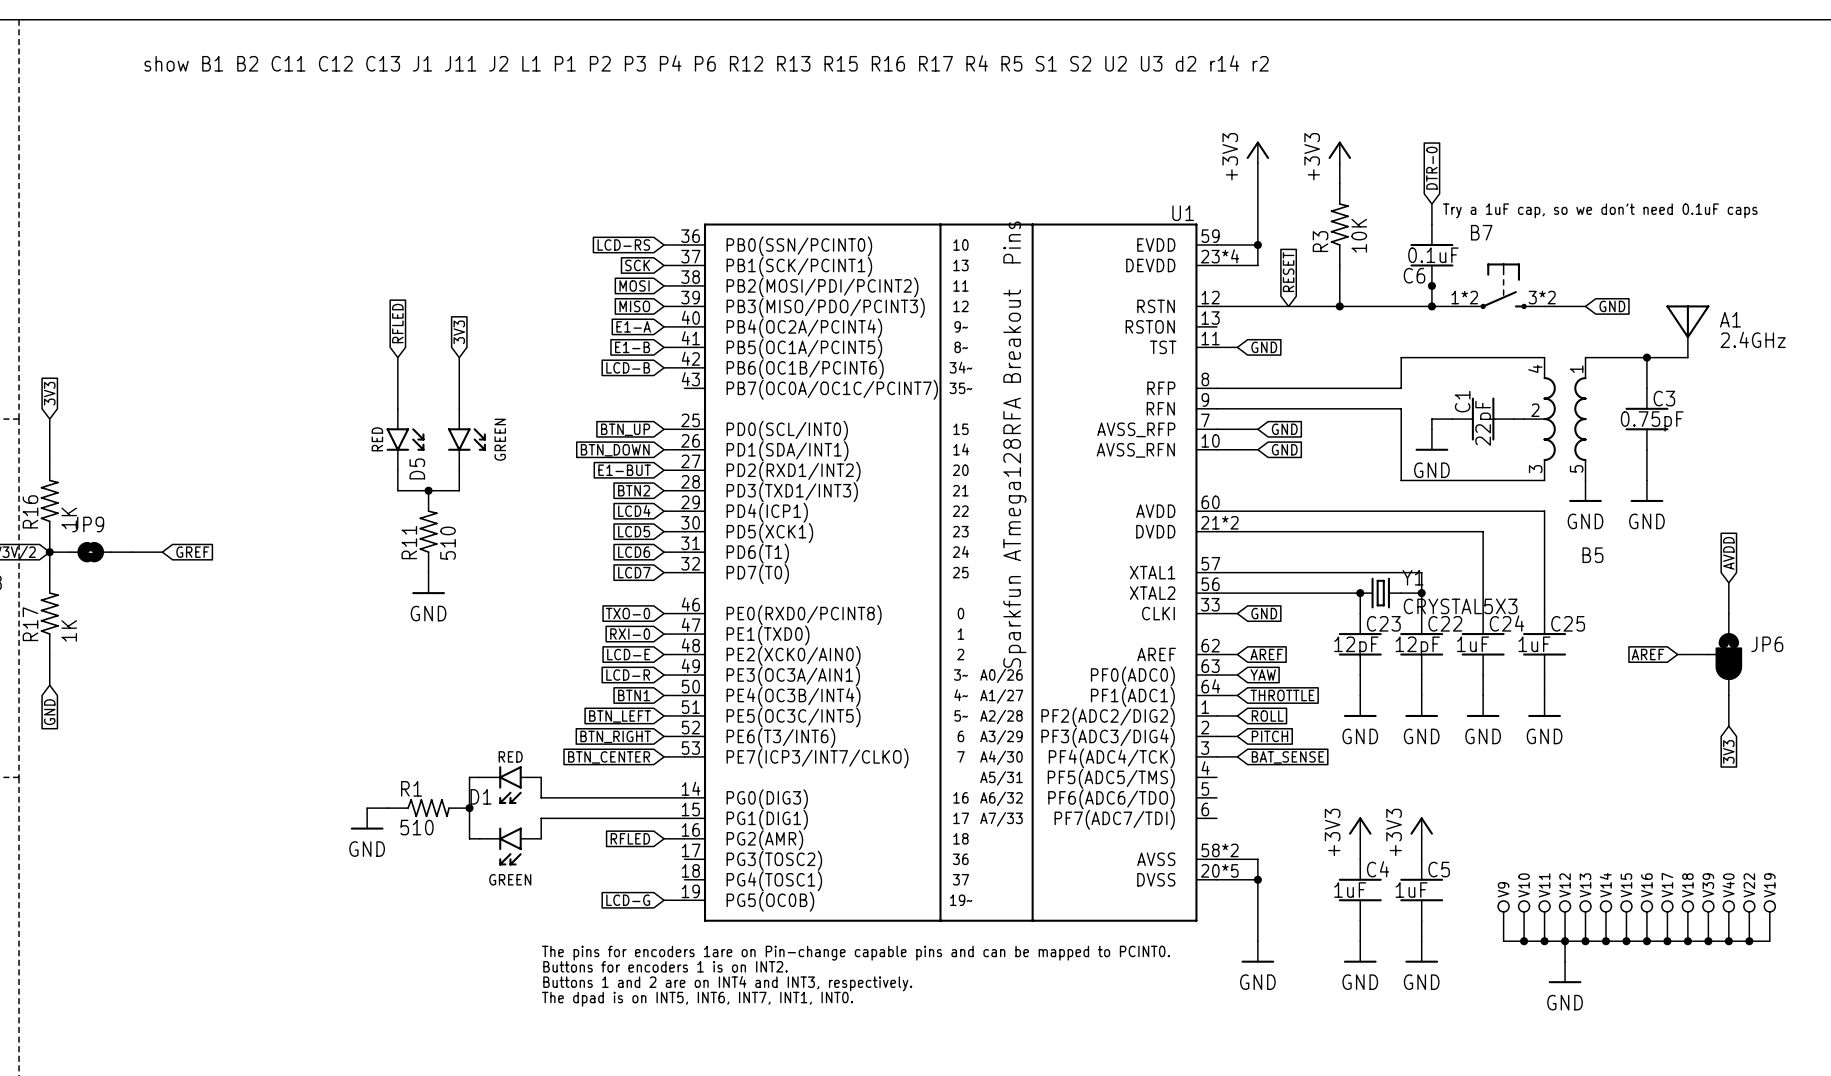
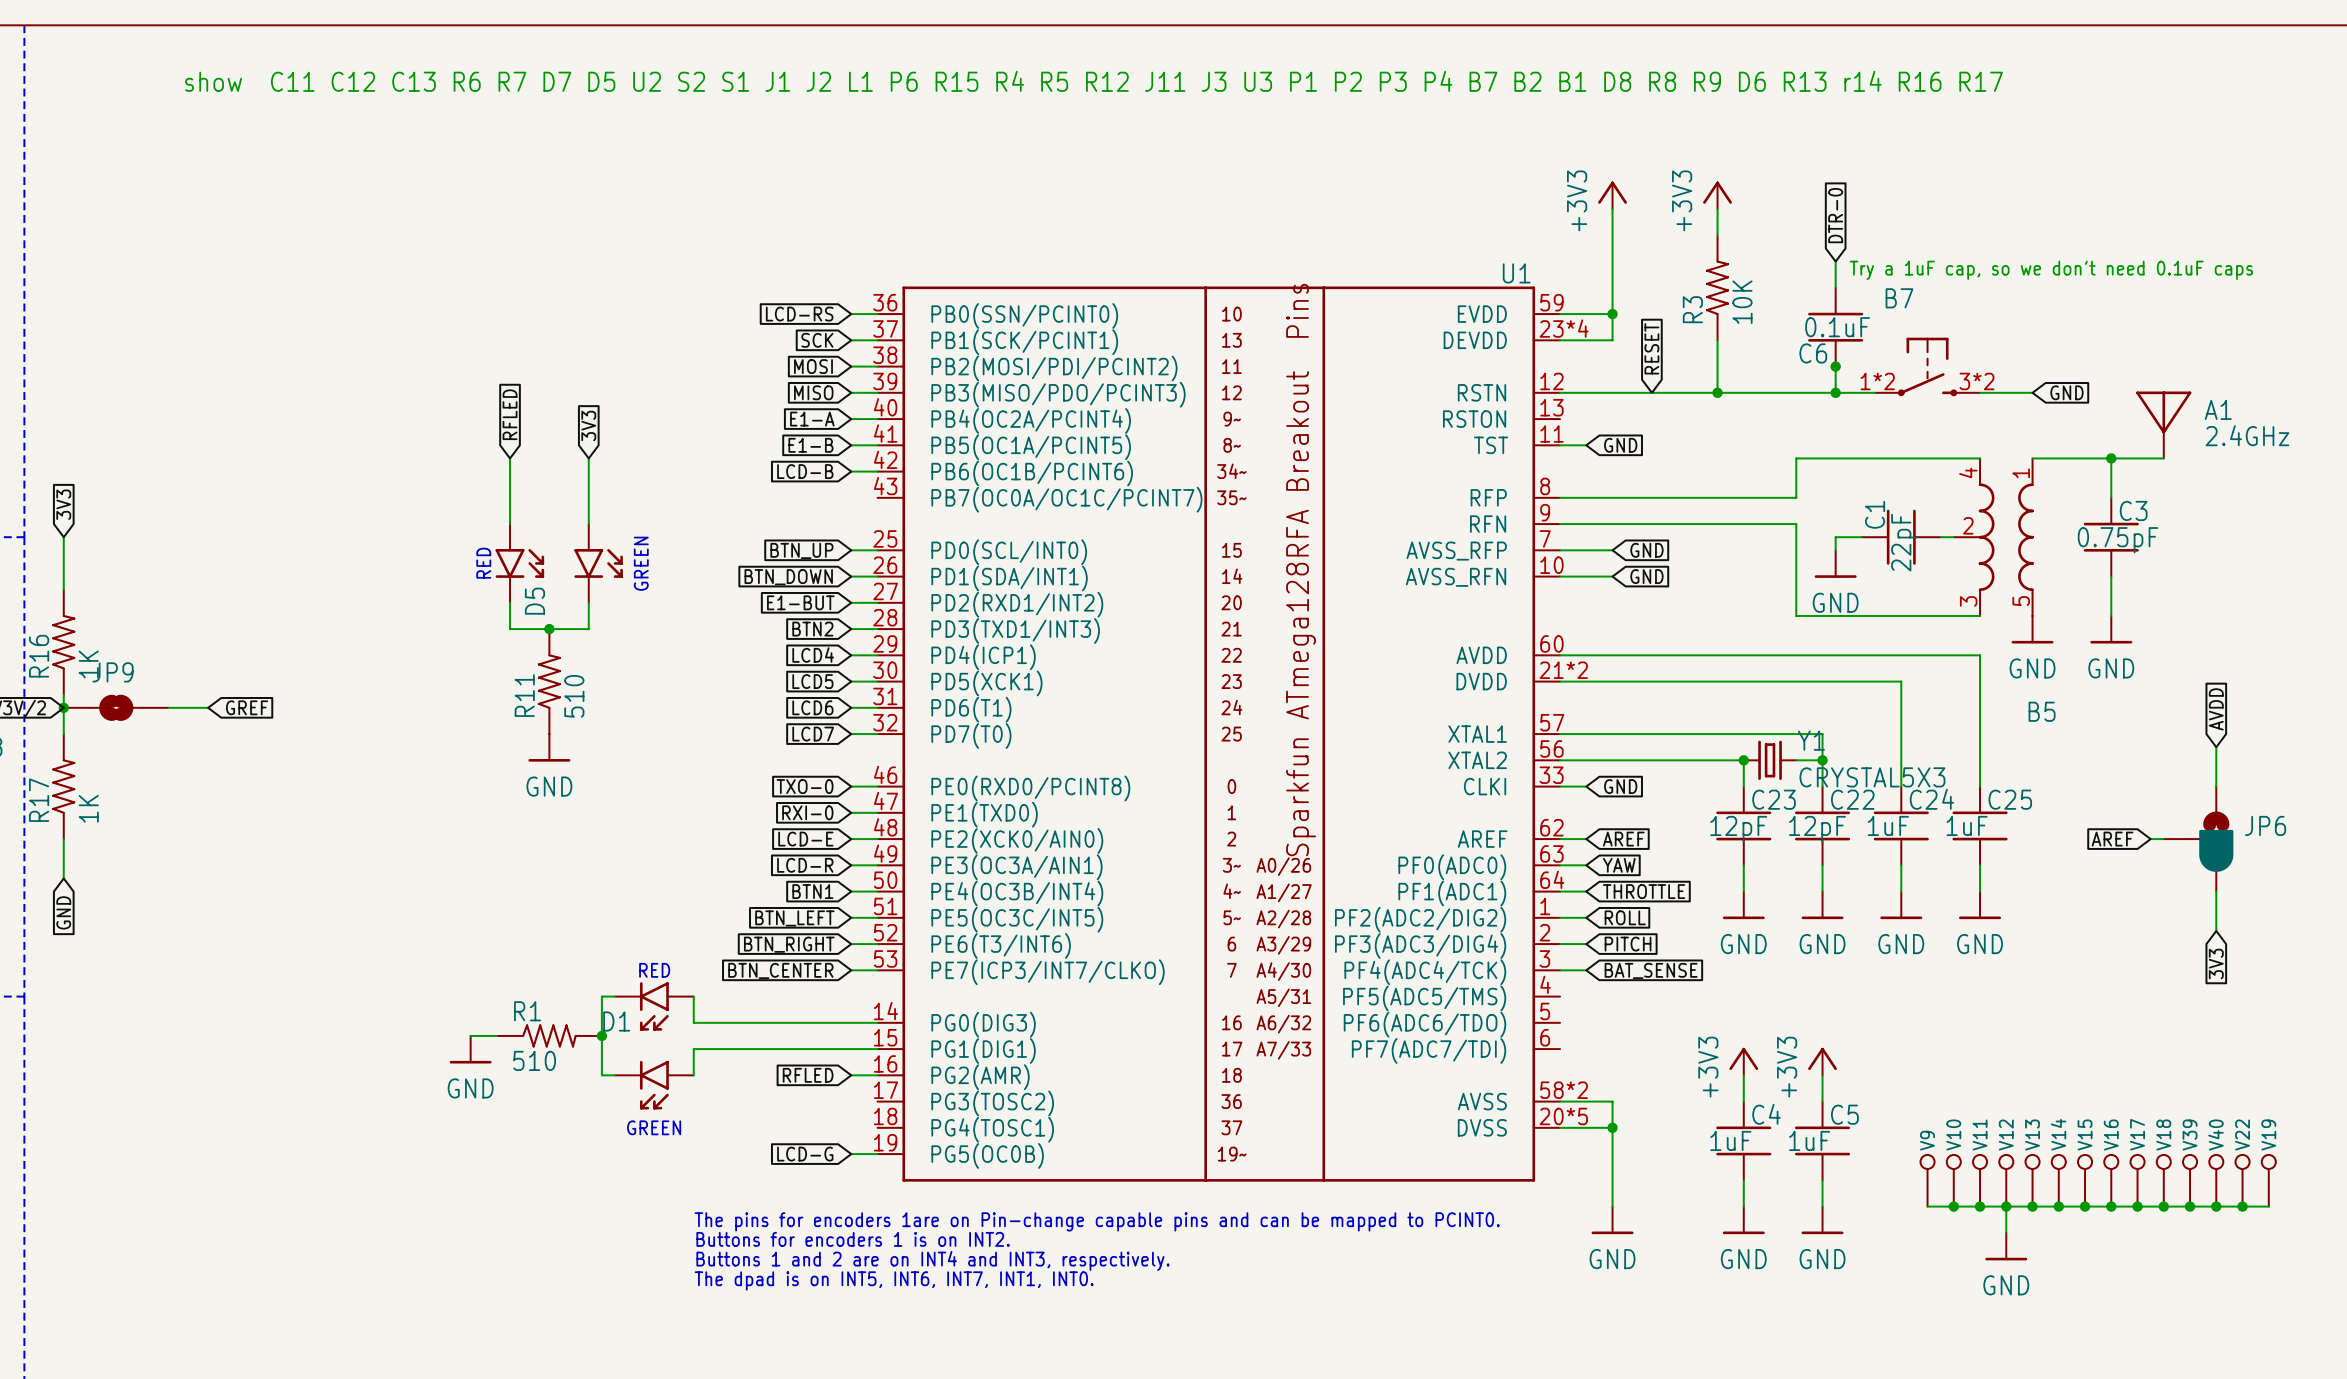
text: show B1 B2 C11 C12 C13 J1 J11 J2 L1 P1 P2 P3 P4 P6 R12 R13 R15 R16 R17 R4 R5 S1 S2 U2 U3 d2 r14 r2 (706, 63) -> show C11 C12 C13 R6 R7 D7 D5 U2 S2 S1 J1 J2 L1 P6 R15 R4 R5 R12 J11 J3 U3 P1 P2 P3 P4 B7 B2 B1 D8 R8 R9 D6 R13 r14 R16 R17 (1094, 81)

